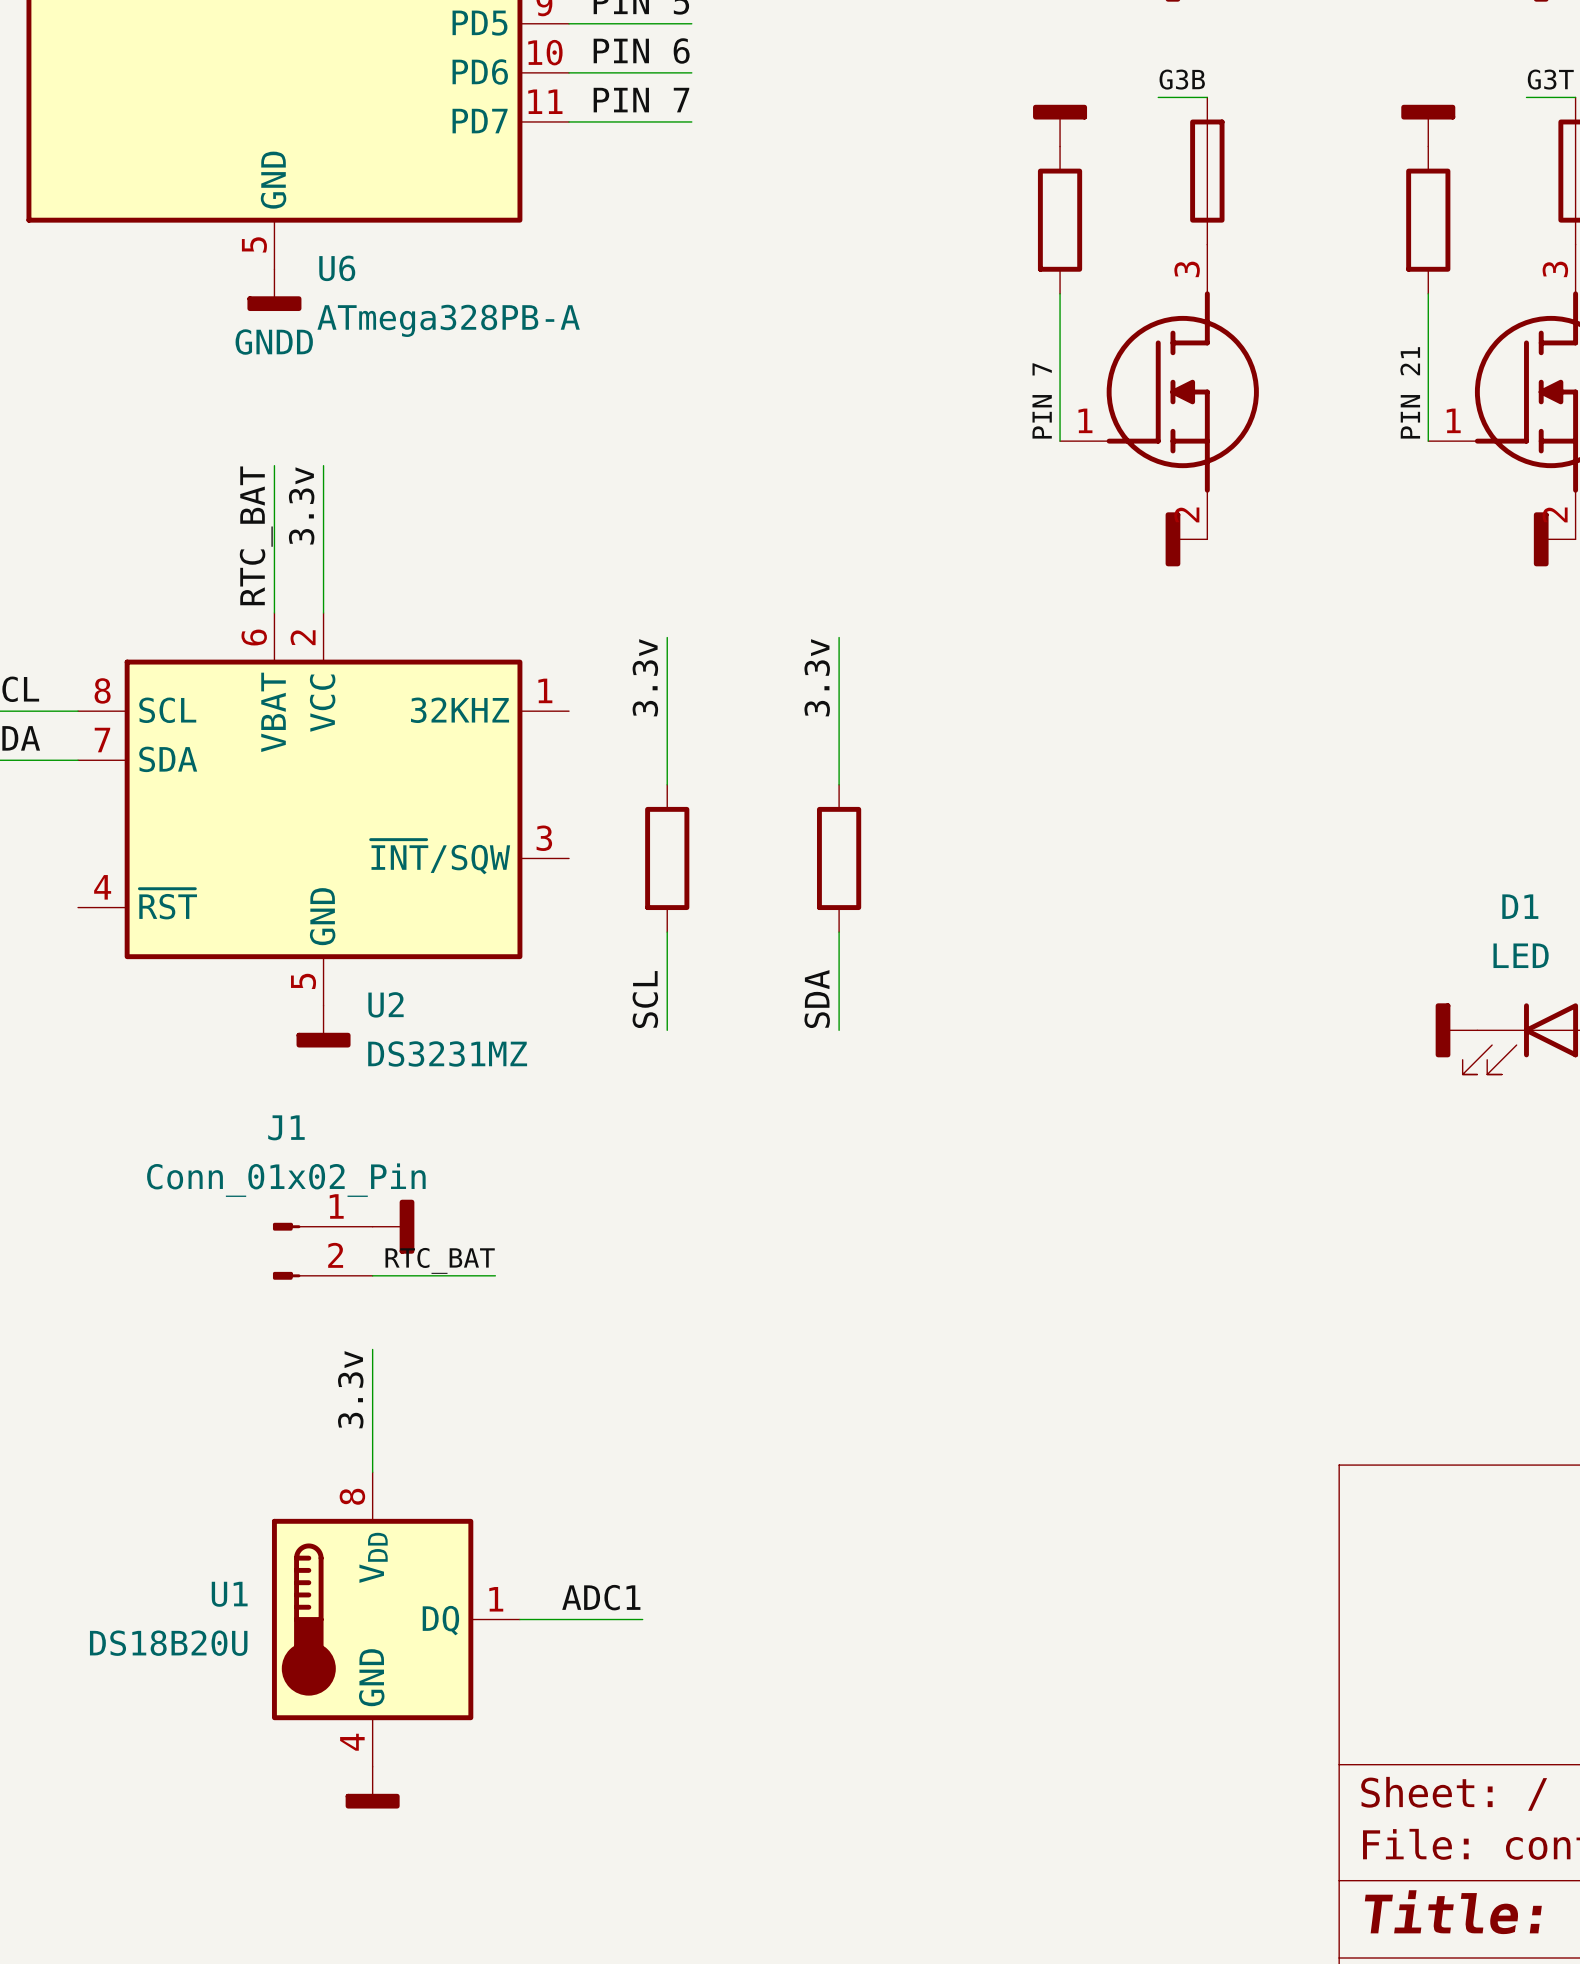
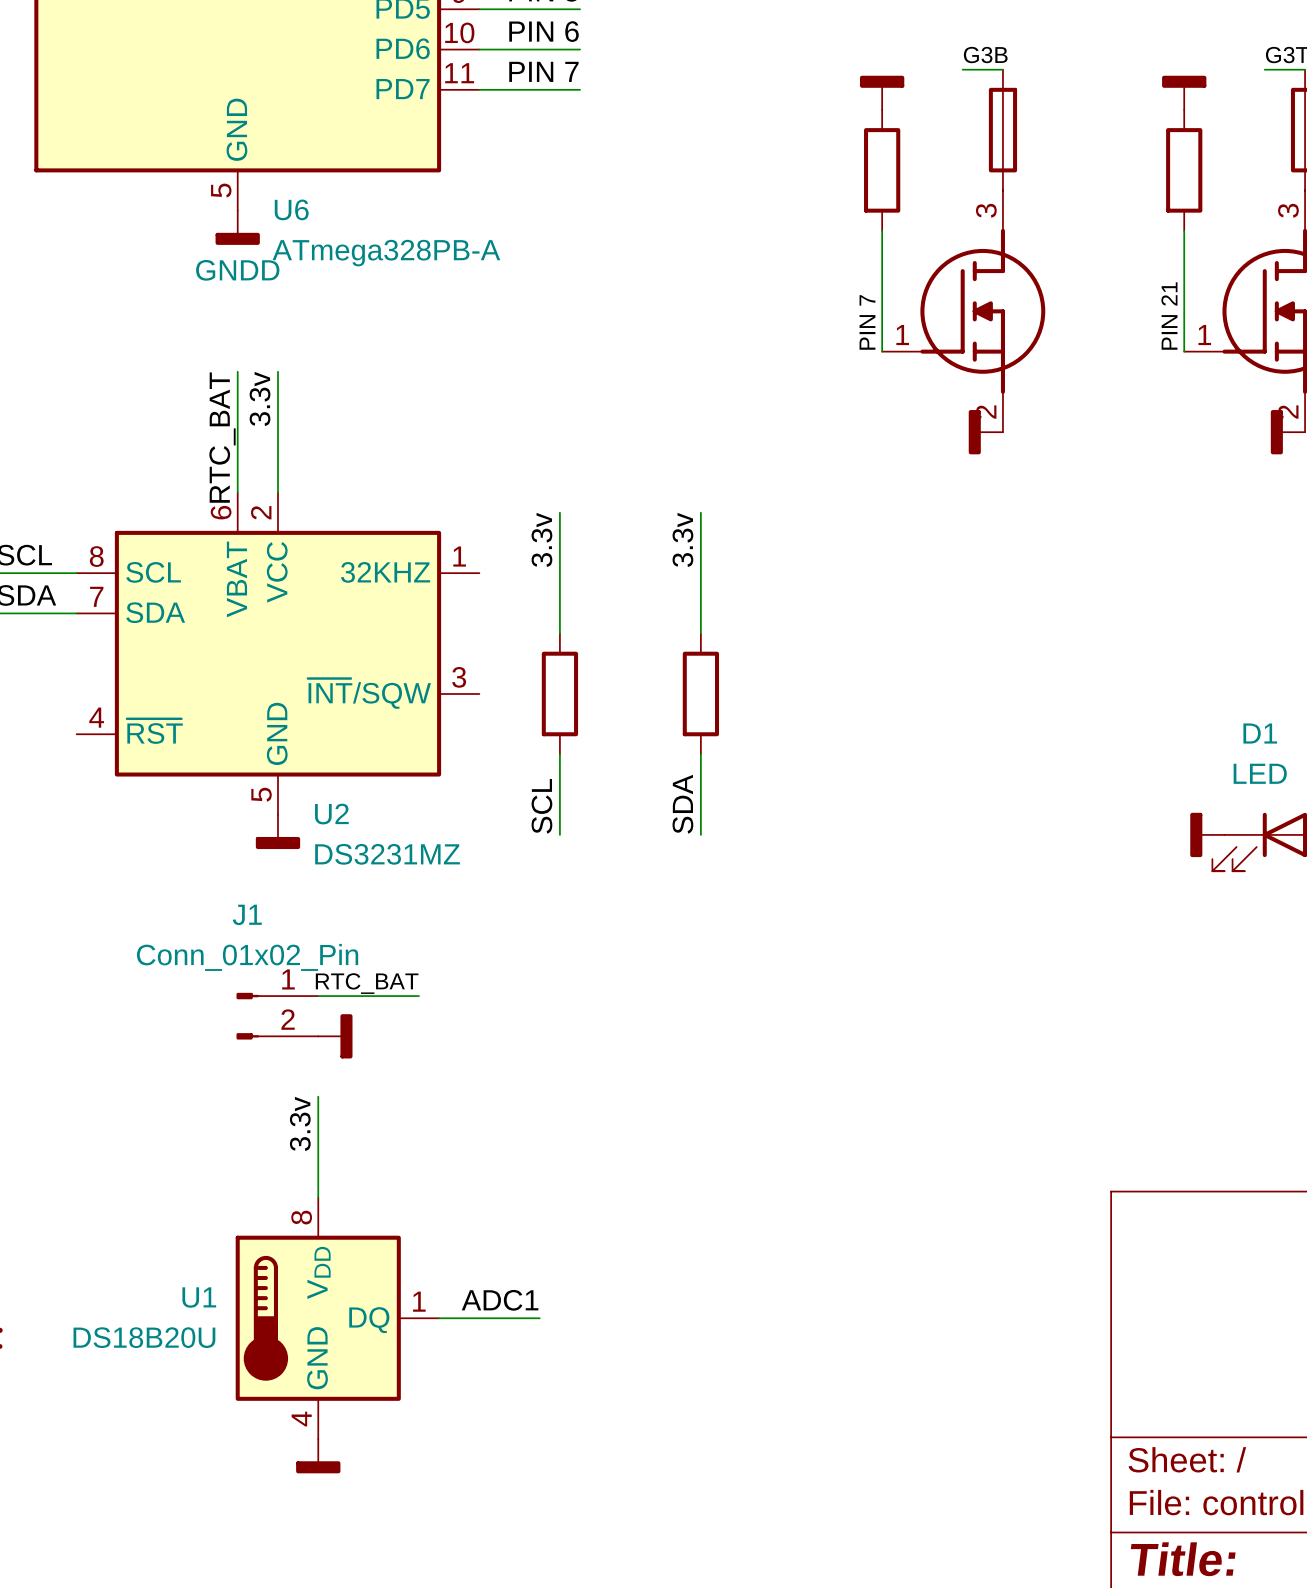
power symbol position: (393, 1226) -> (335, 1036)
label position: RTC_BAT (440, 1260) -> RTC_BAT (367, 983)
wire: (372, 1275) (495, 1275) -> (318, 996) (418, 996)

